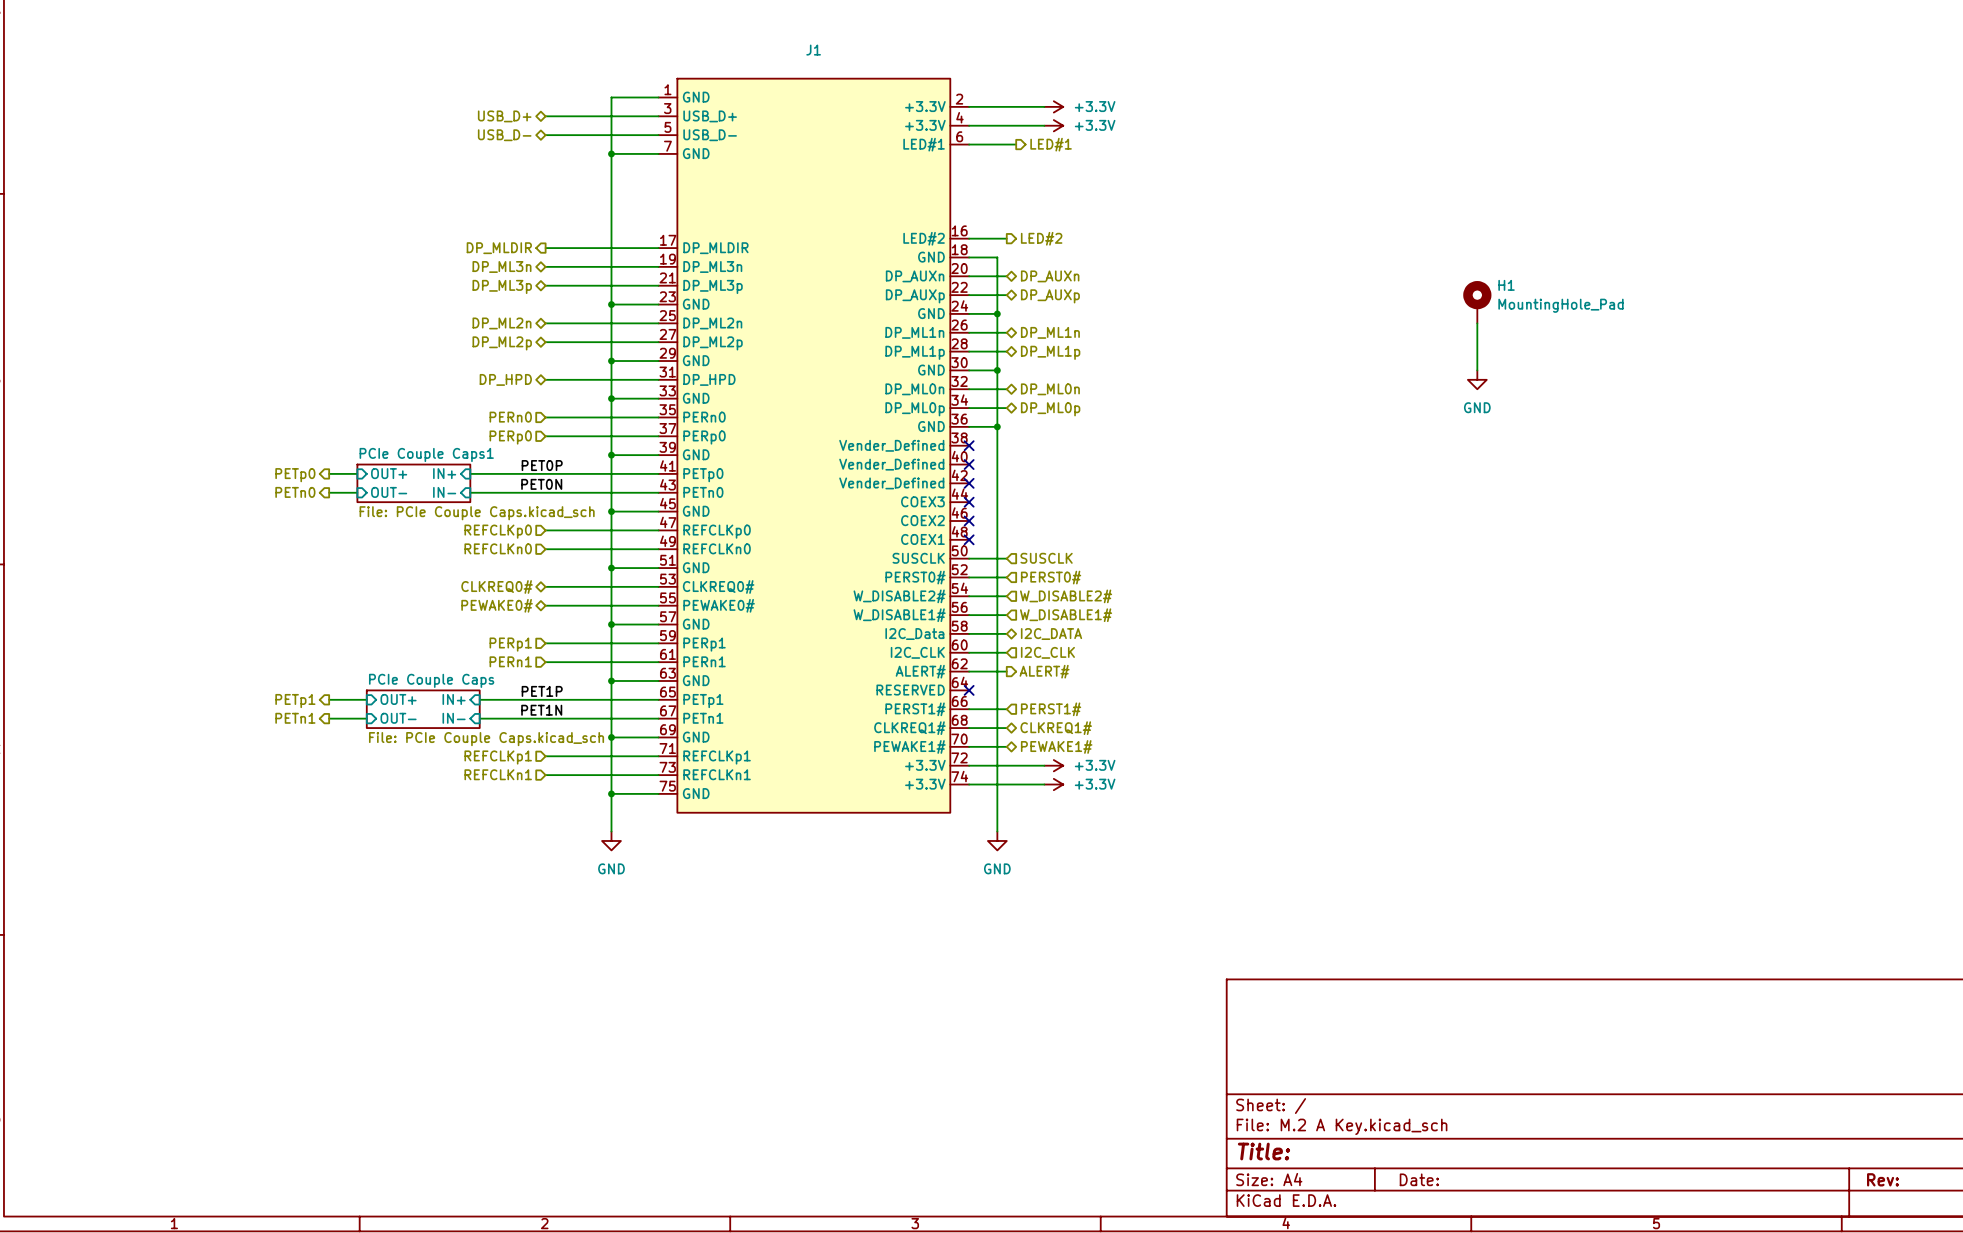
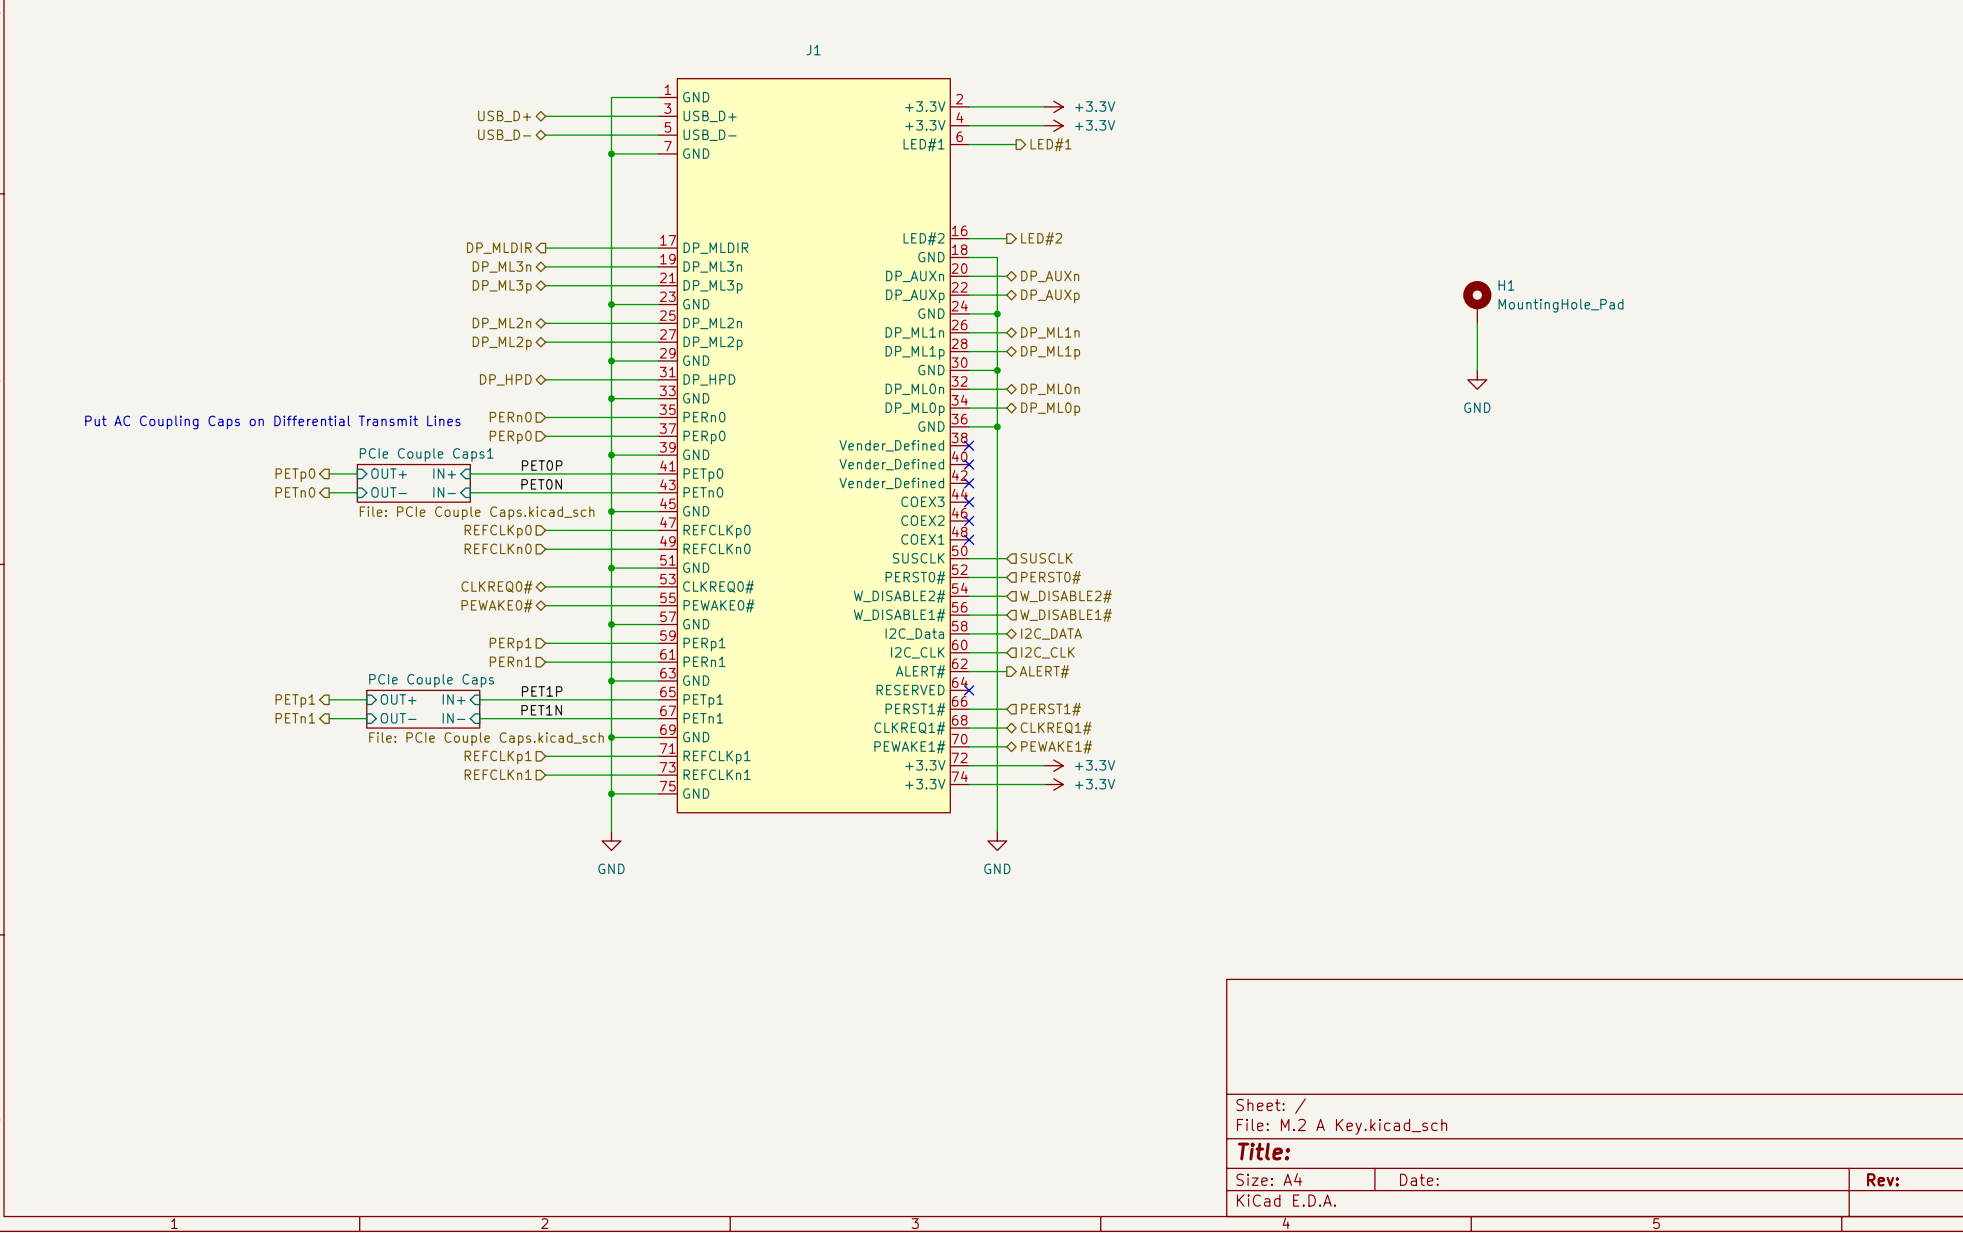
text: none -> Put AC Coupling Caps on Differential Transmit Lines (272, 422)

